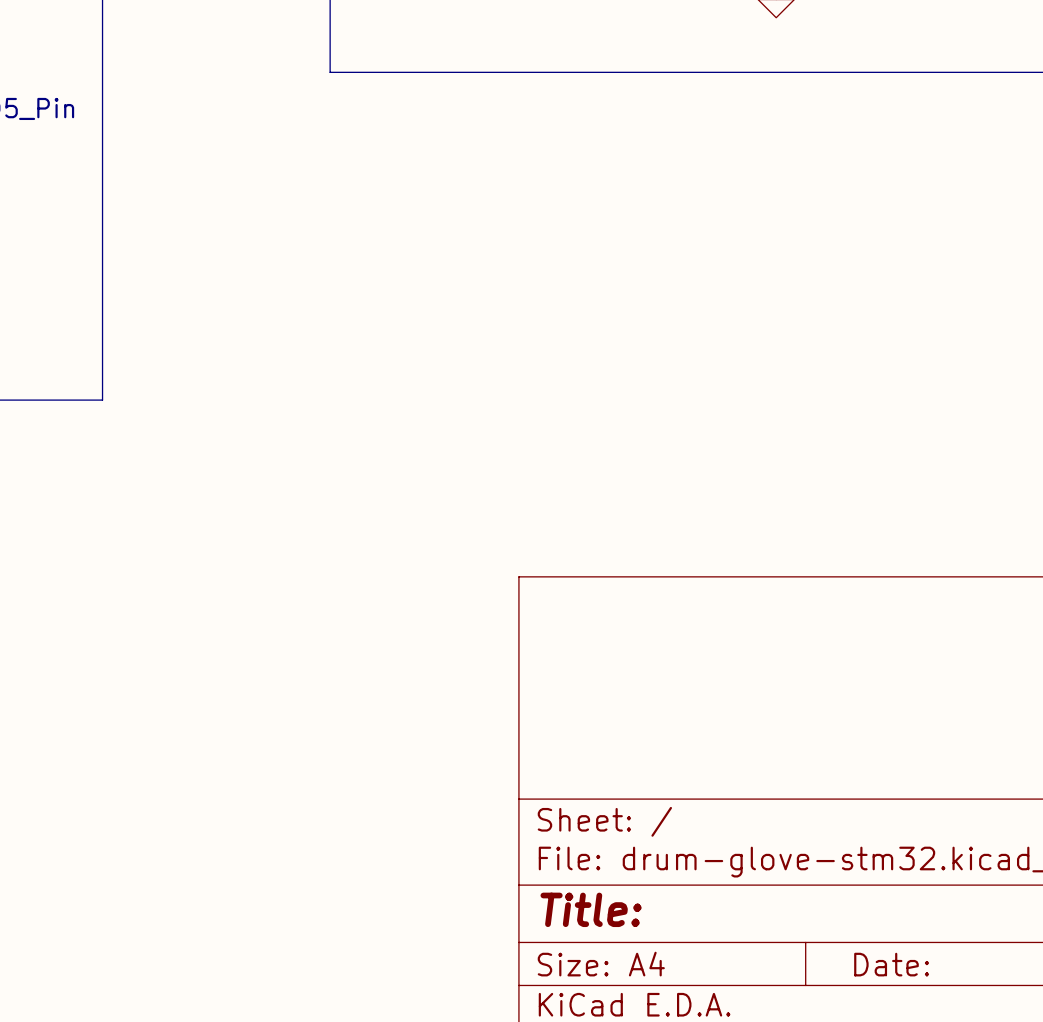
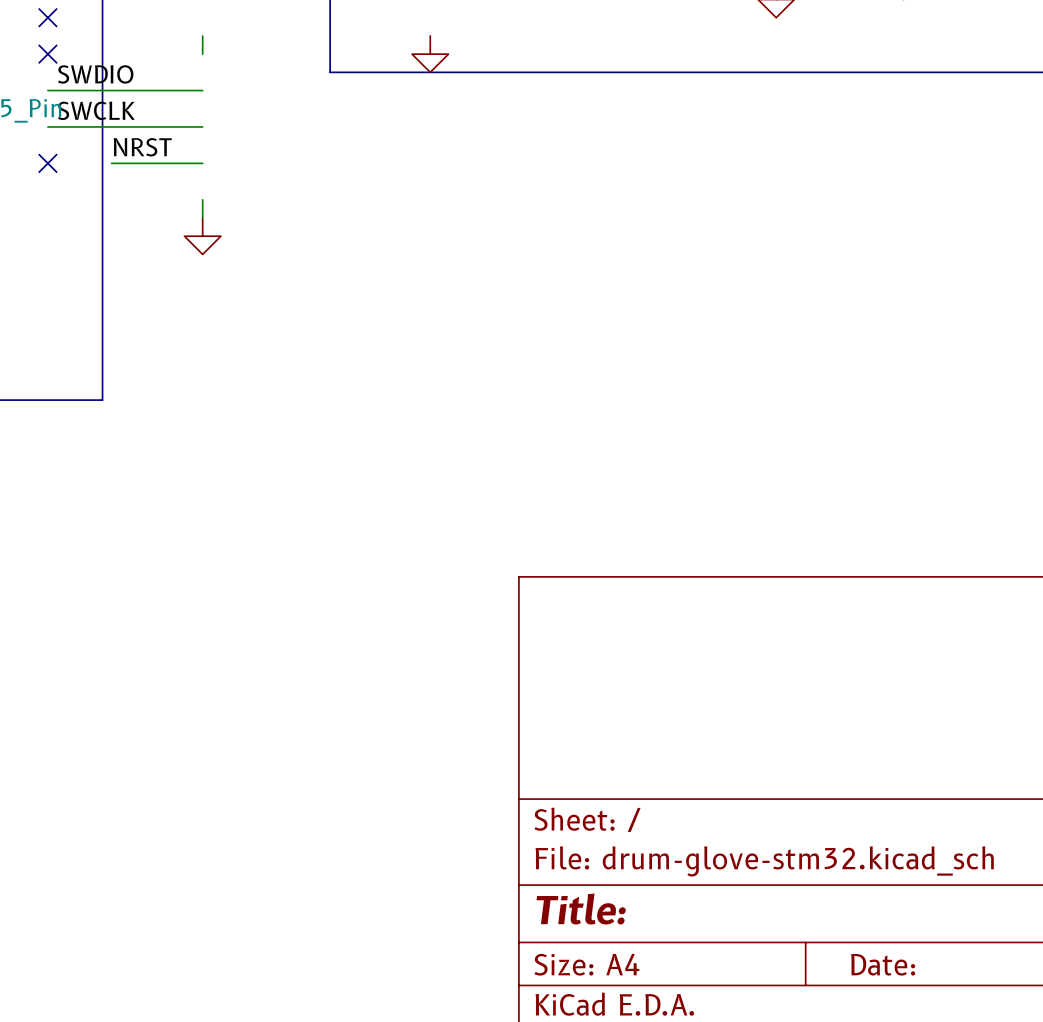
no-connect mark: none -> (47, 17)
wire: none -> (202, 35) (202, 54)
no-connect mark: none -> (47, 54)
power symbol: none -> (430, 54)
label: none -> SWDIO (95, 74)
wire: none -> (47, 90) (202, 90)
label: none -> SWCLK (96, 110)
wire: none -> (47, 126) (202, 126)
label: none -> NRST (142, 147)
no-connect mark: none -> (47, 163)
wire: none -> (111, 163) (202, 163)
wire: none -> (202, 199) (202, 218)
power symbol: none -> (202, 236)

